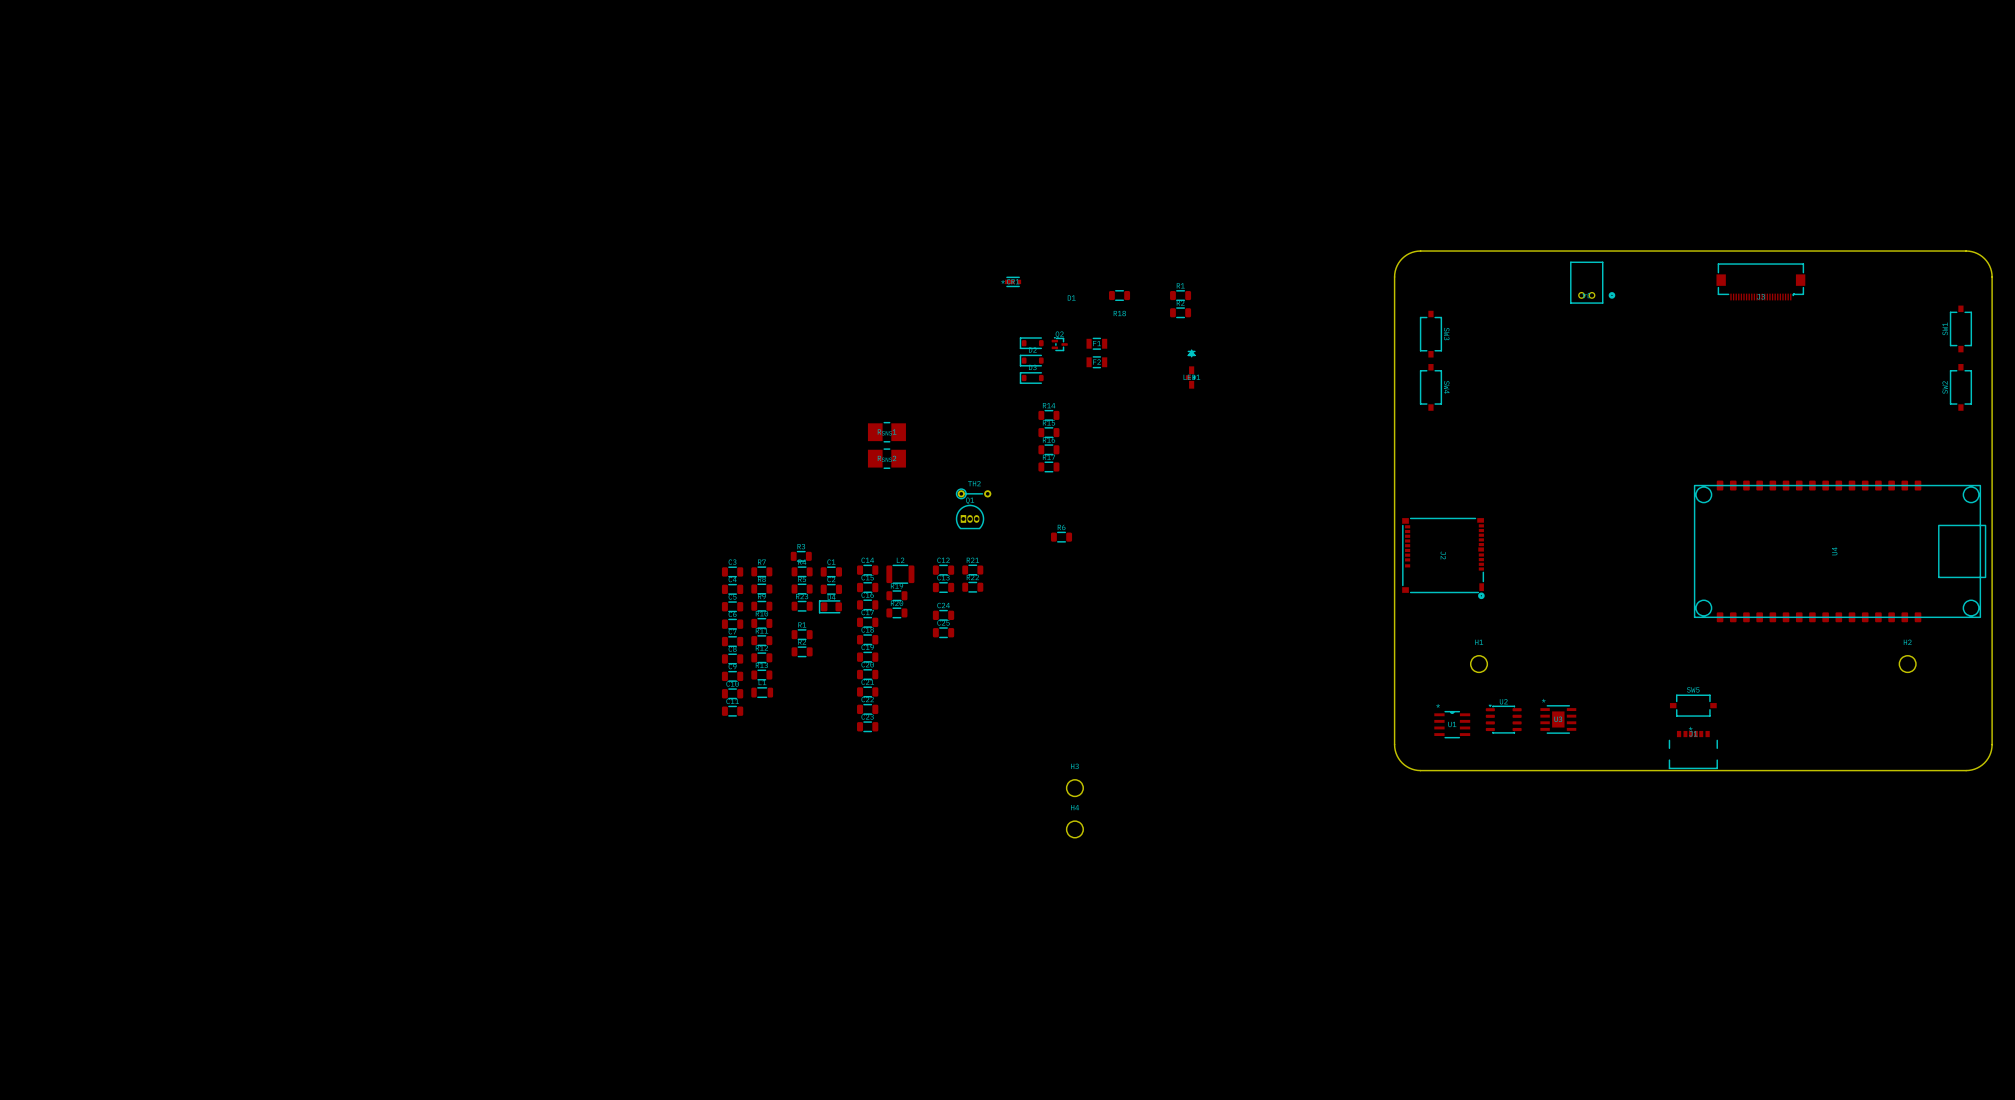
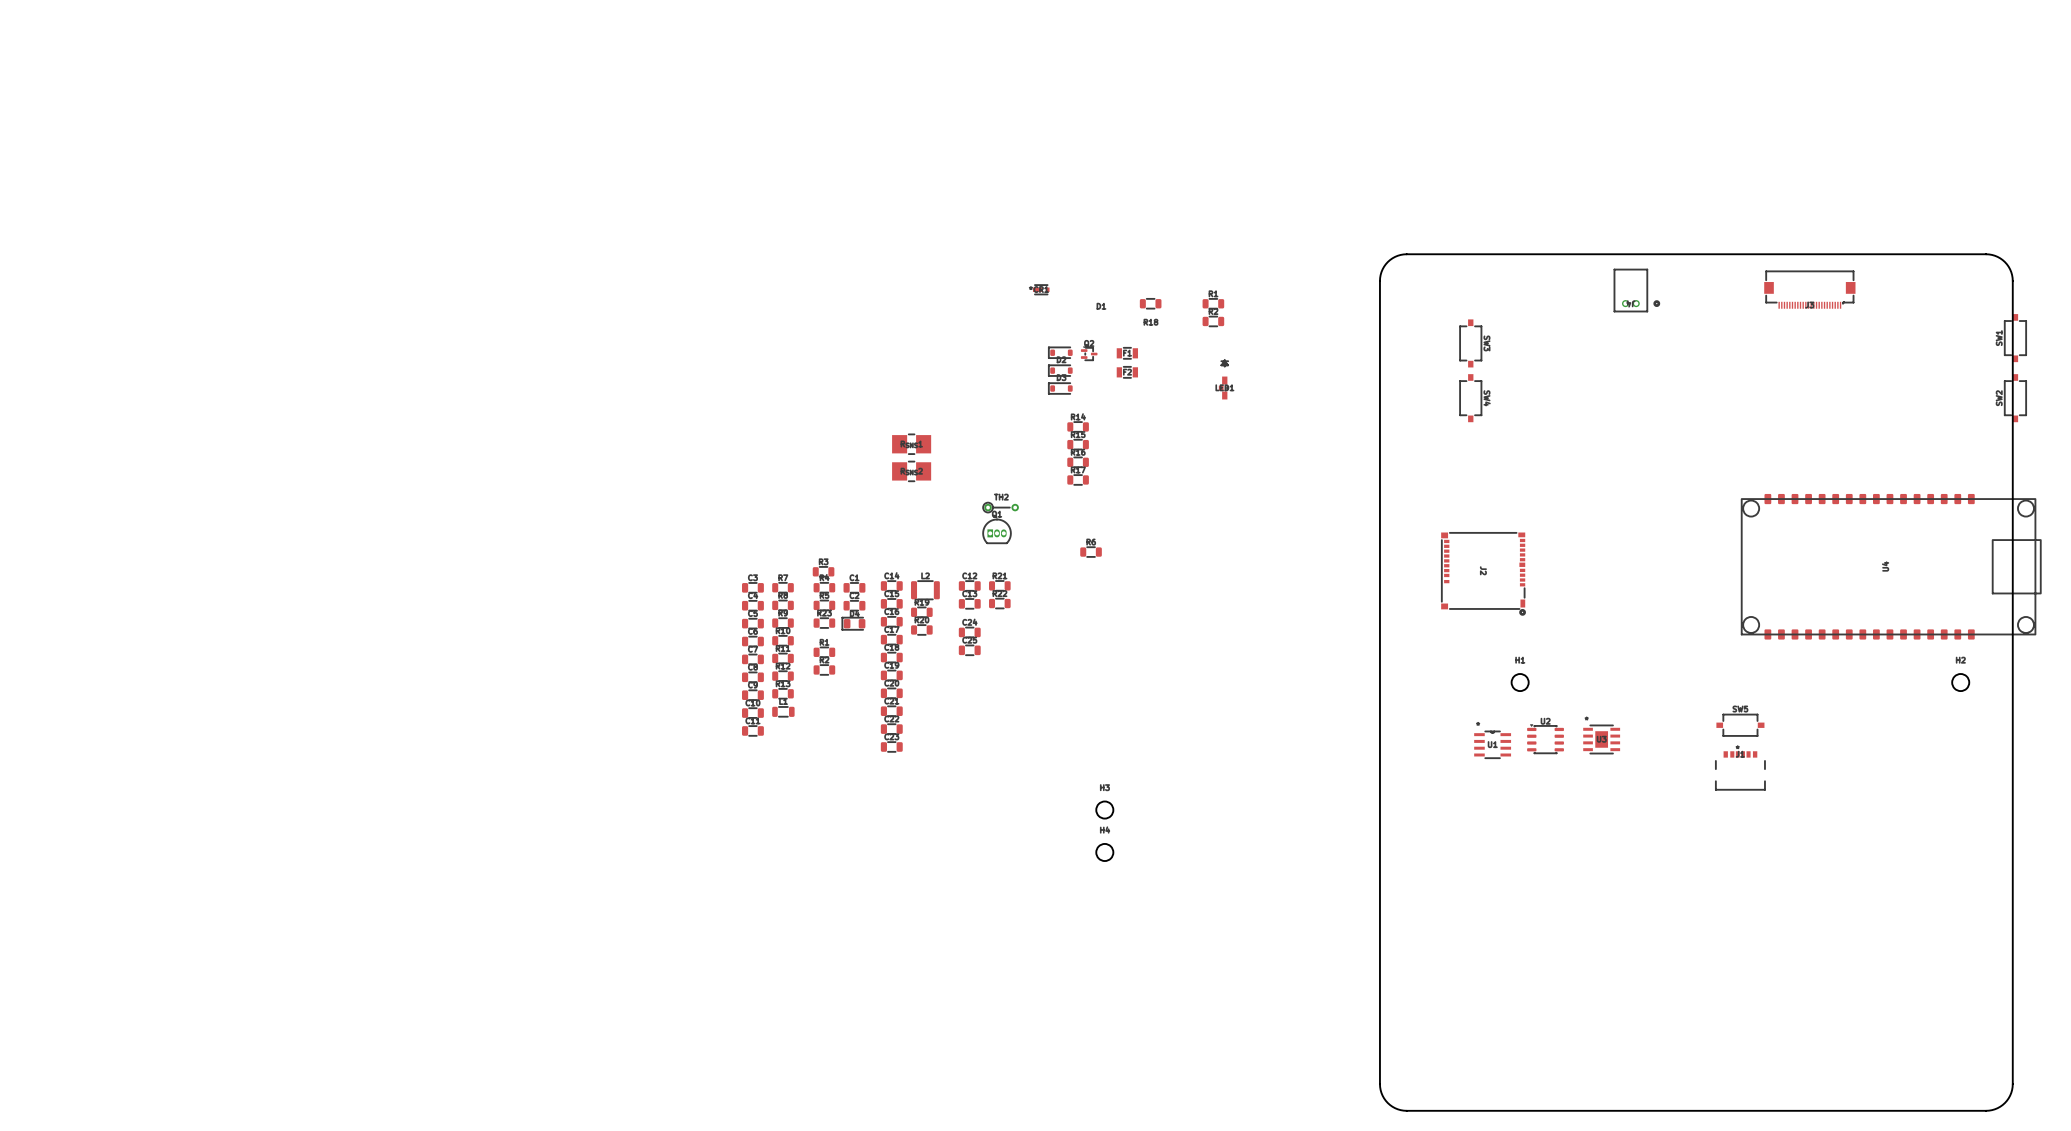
board edge: (1420, 251) (1966, 251) (1974, 252) (1984, 258) (1990, 268) (1992, 276) (1992, 744) (1990, 753) (1984, 762) (1977, 768) (1966, 770) (1420, 770) (1409, 768) (1402, 762) (1397, 755) (1394, 744) (1394, 276) (1396, 268) (1402, 258) (1411, 252) (1420, 251) -> (1406, 254) (1397, 255) (1387, 262) (1382, 269) (1379, 280) (1379, 1084) (1384, 1098) (1392, 1106) (1406, 1110) (1986, 1110) (2000, 1106) (2010, 1095) (2012, 1084) (2012, 280) (2008, 266) (1997, 256) (1986, 254) (1406, 254)

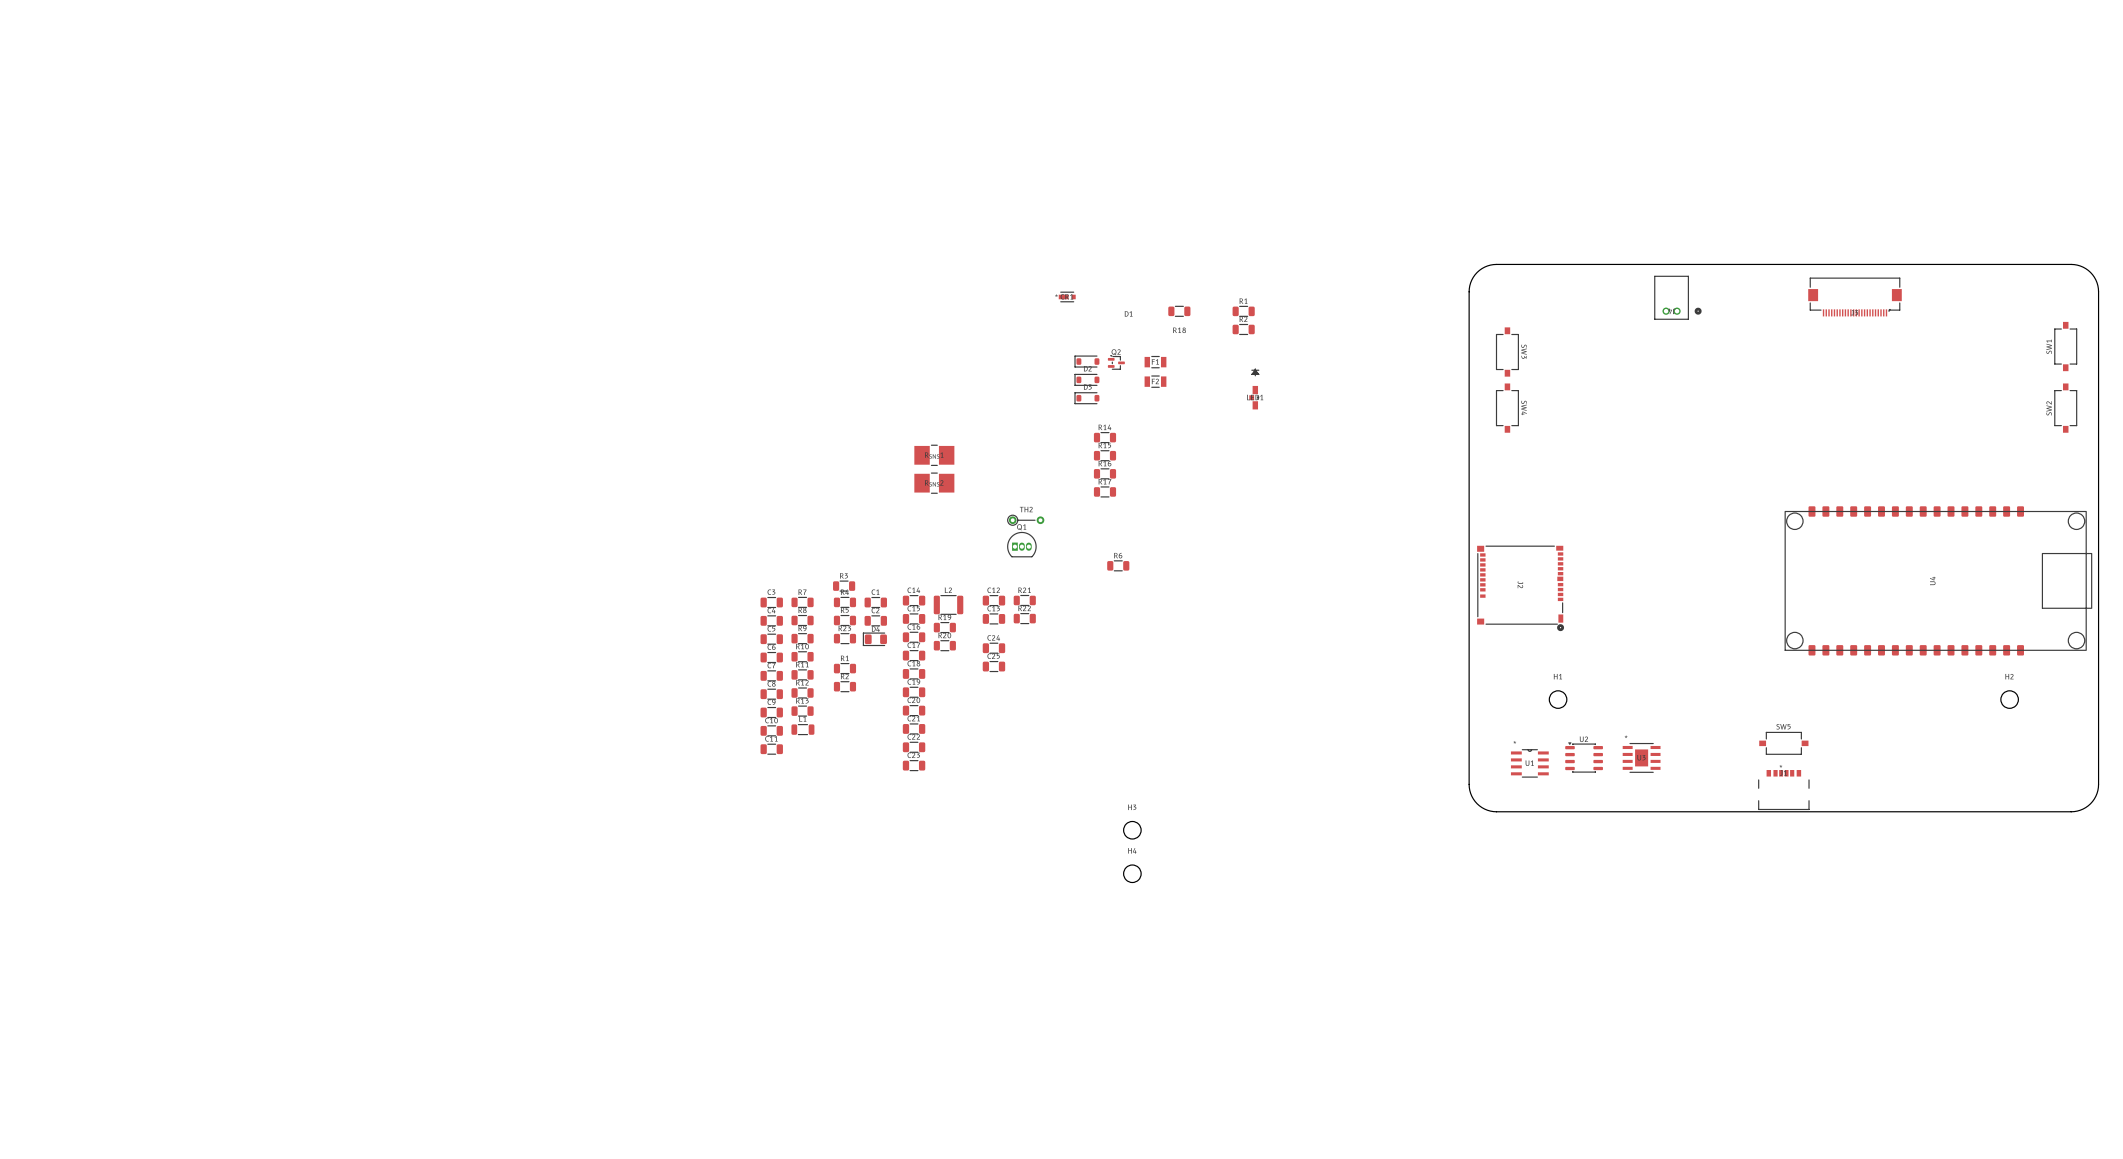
board edge: (1406, 254) (1986, 254) (1997, 256) (2008, 266) (2012, 280) (2012, 1084) (2010, 1095) (2000, 1106) (1986, 1110) (1406, 1110) (1392, 1106) (1384, 1098) (1379, 1084) (1379, 280) (1382, 269) (1387, 262) (1397, 255) (1406, 254) -> (1496, 264) (1487, 265) (1477, 272) (1470, 282) (1469, 291) (1469, 784) (1471, 796) (1477, 803) (1484, 809) (1496, 811) (2071, 811) (2083, 809) (2090, 803) (2097, 793) (2098, 784) (2098, 291) (2097, 282) (2090, 272) (2080, 265) (2071, 264) (1496, 264)

